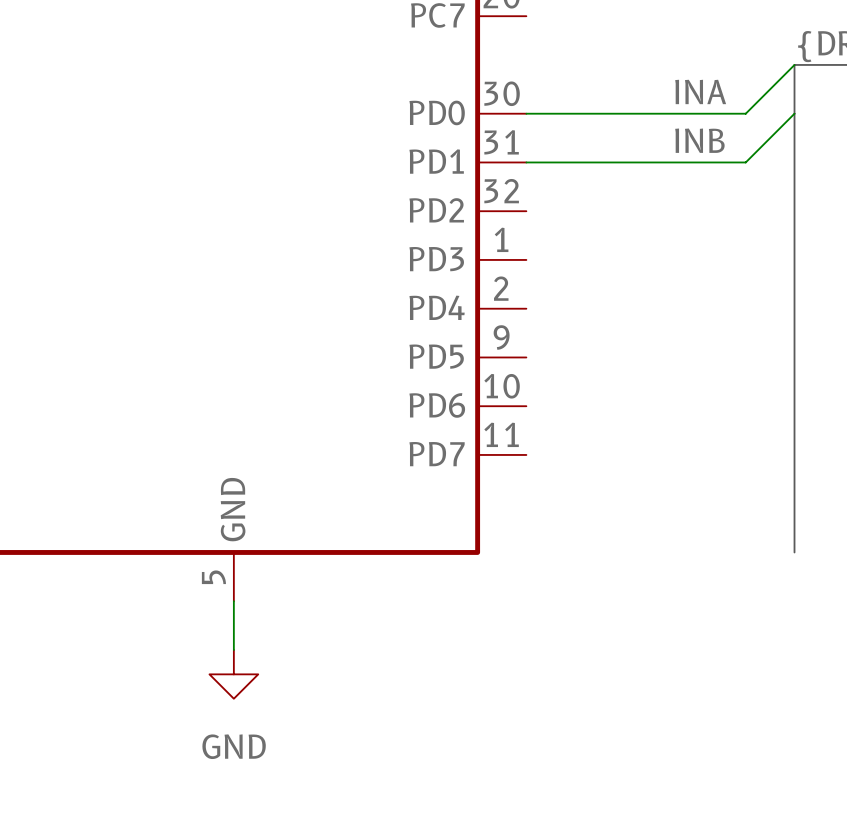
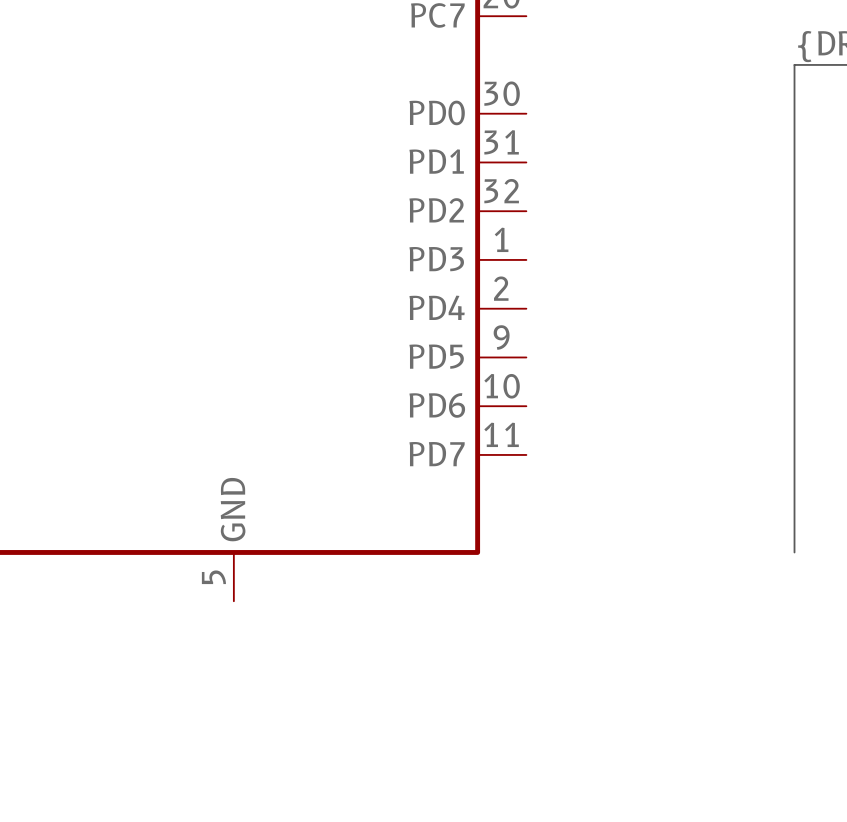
wire: (794, 64) (745, 113) (526, 113) -> none
label: INA (700, 91) -> none
wire: (794, 113) (745, 162) (526, 162) -> none
label: INB (699, 140) -> none
wire: (233, 601) (233, 649) -> none
power symbol: GND (233, 674) -> none

